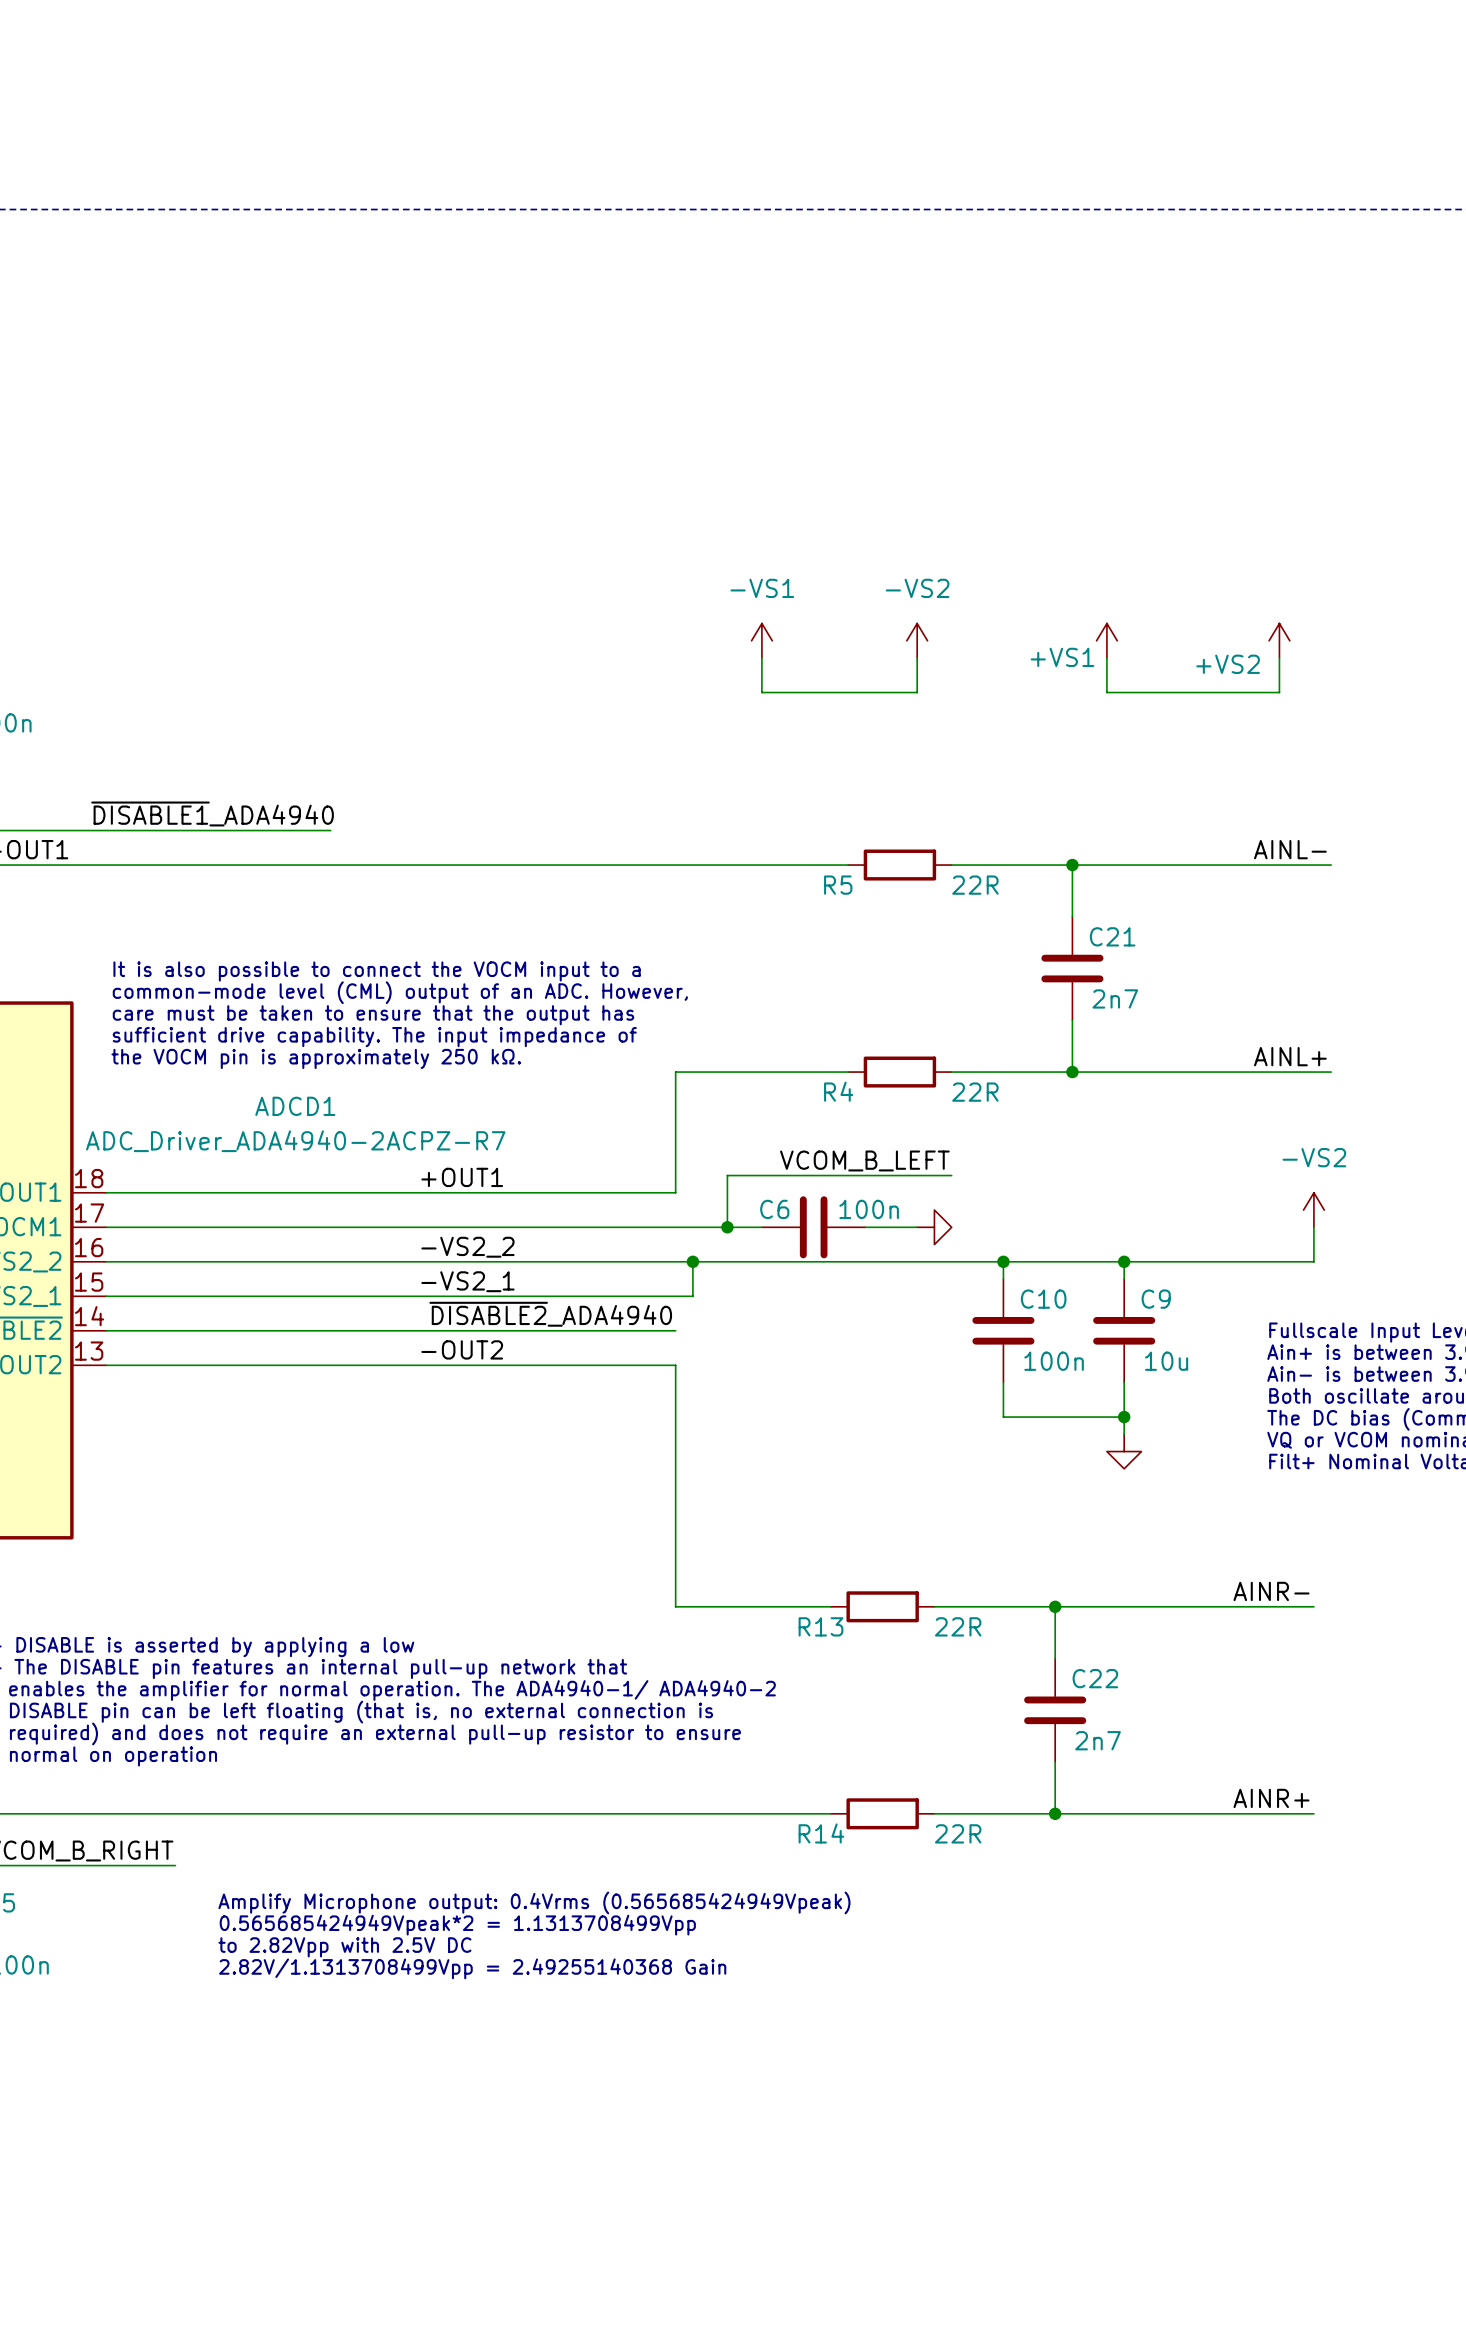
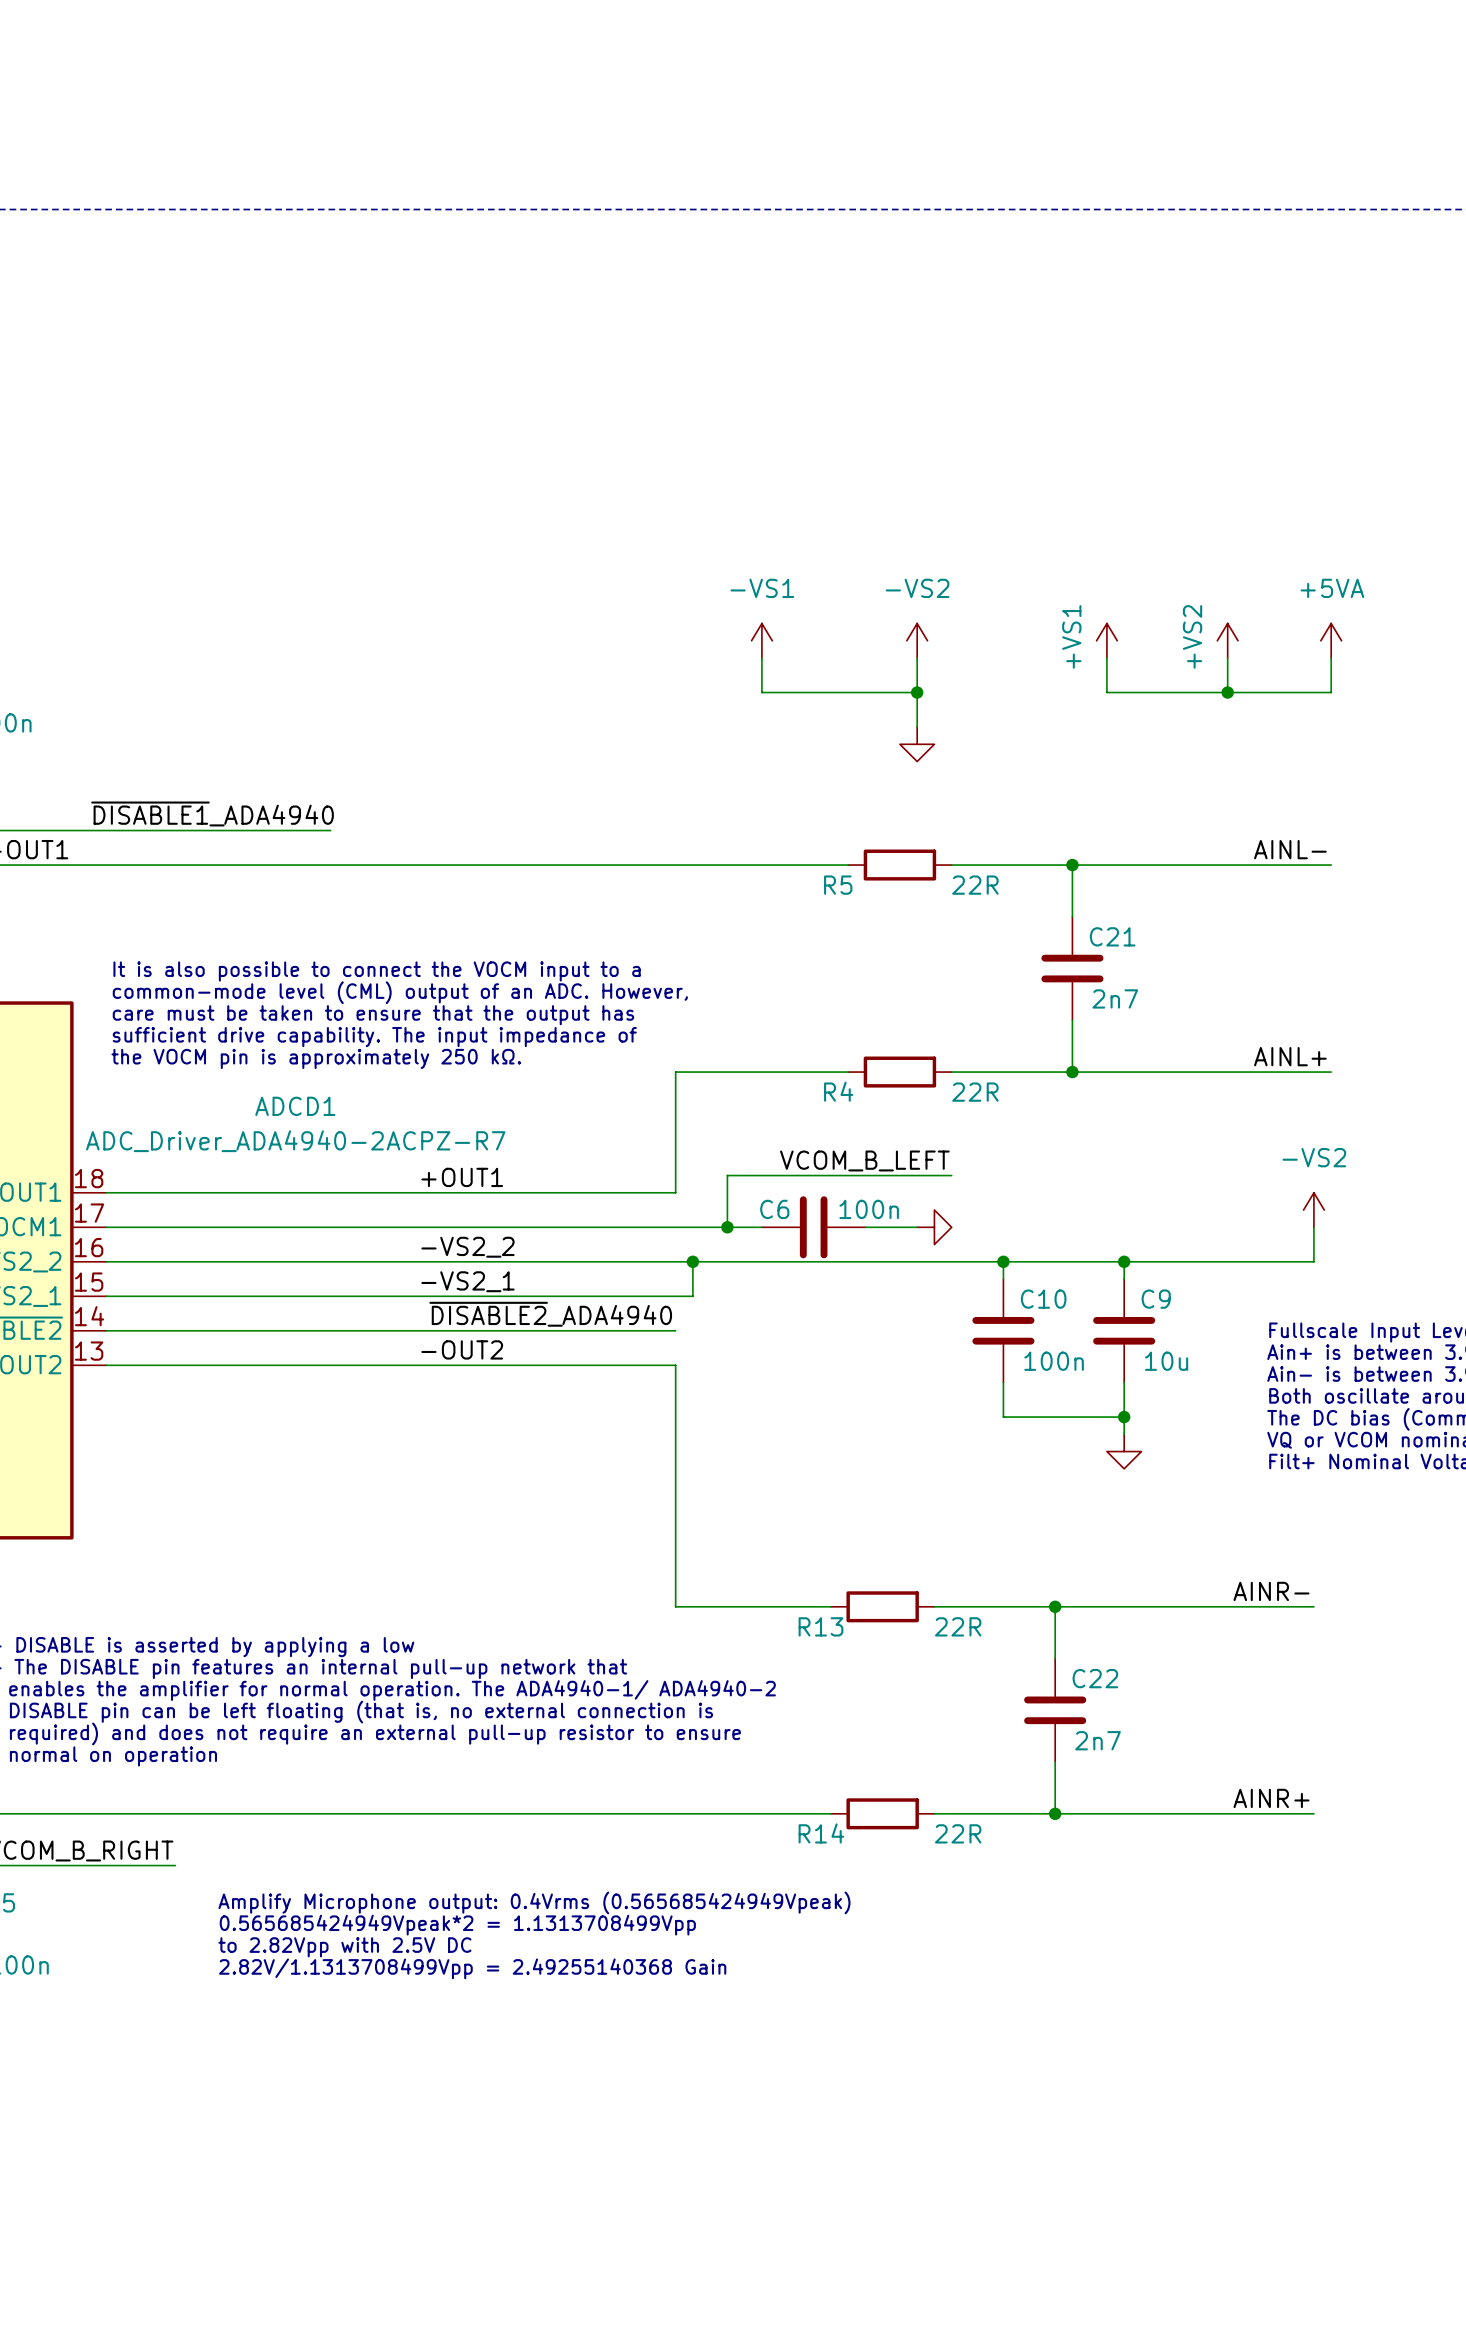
power symbol position: +VS2 (1279, 640) -> +VS2 (1227, 640)
power symbol: none -> +5VA (1331, 640)
power symbol text rotation: 0° (1062, 657) -> 90° counterclockwise (1071, 636)
wire: none -> (1227, 658) (1227, 692)
wire: (1279, 658) (1279, 692) -> (1331, 658) (1331, 692) (1279, 692)
power symbol text rotation: 0° (1228, 664) -> 90° counterclockwise (1192, 636)
wire: none -> (917, 692) (917, 727)
junction: none -> (917, 692)
junction: none -> (1227, 692)
power symbol: none -> (917, 744)

